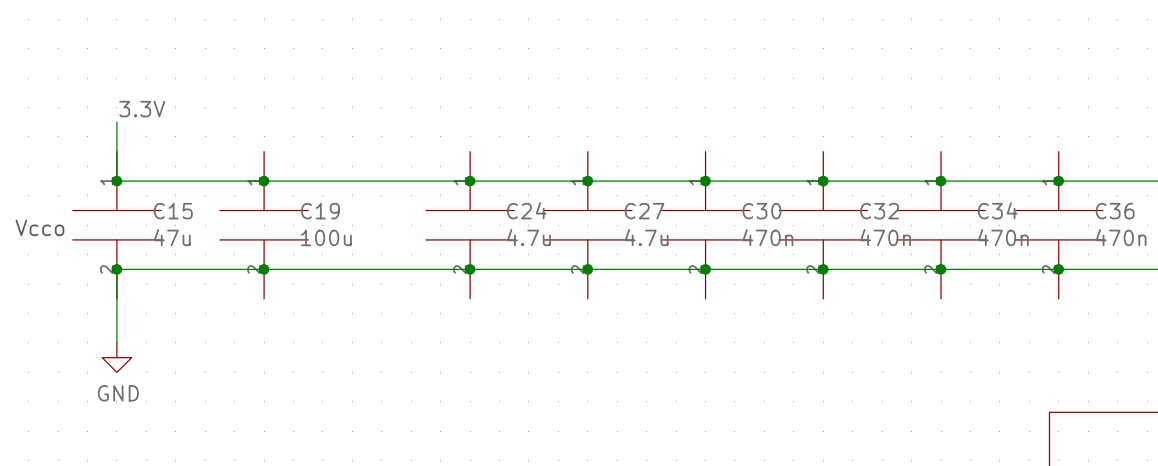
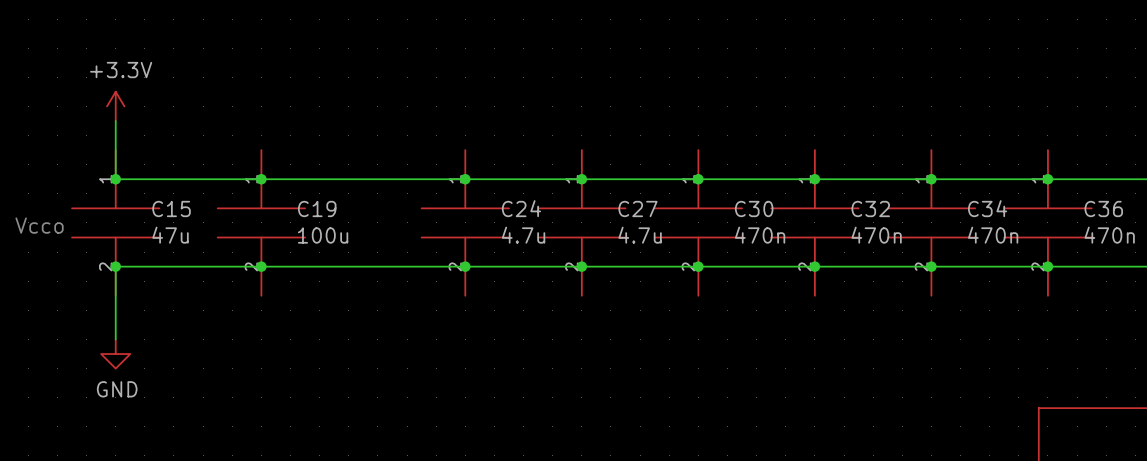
power symbol: none -> +3.3V (115, 106)
label: 3.3V (142, 109) -> none

